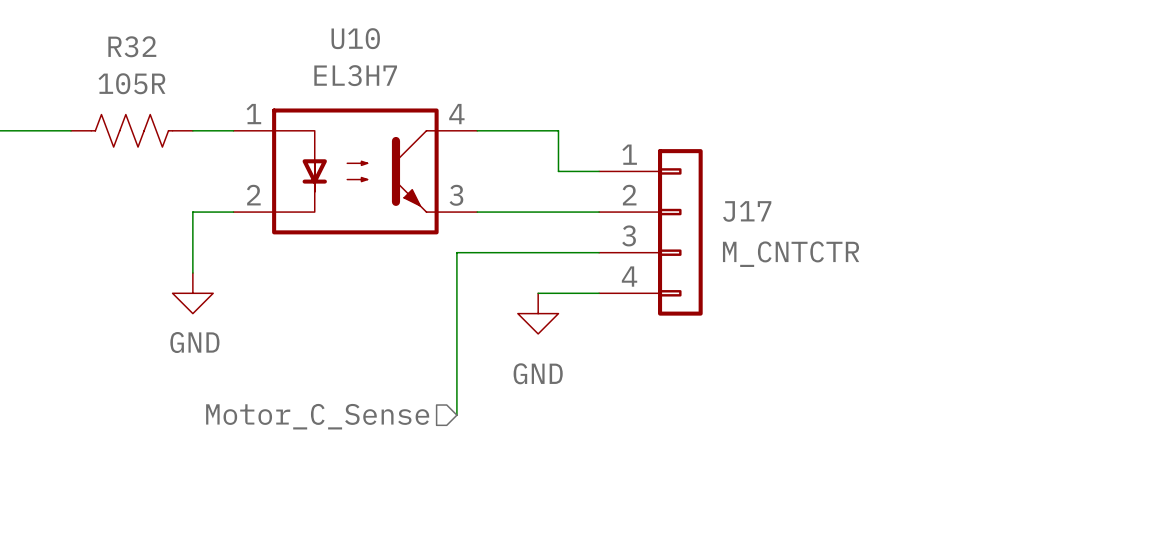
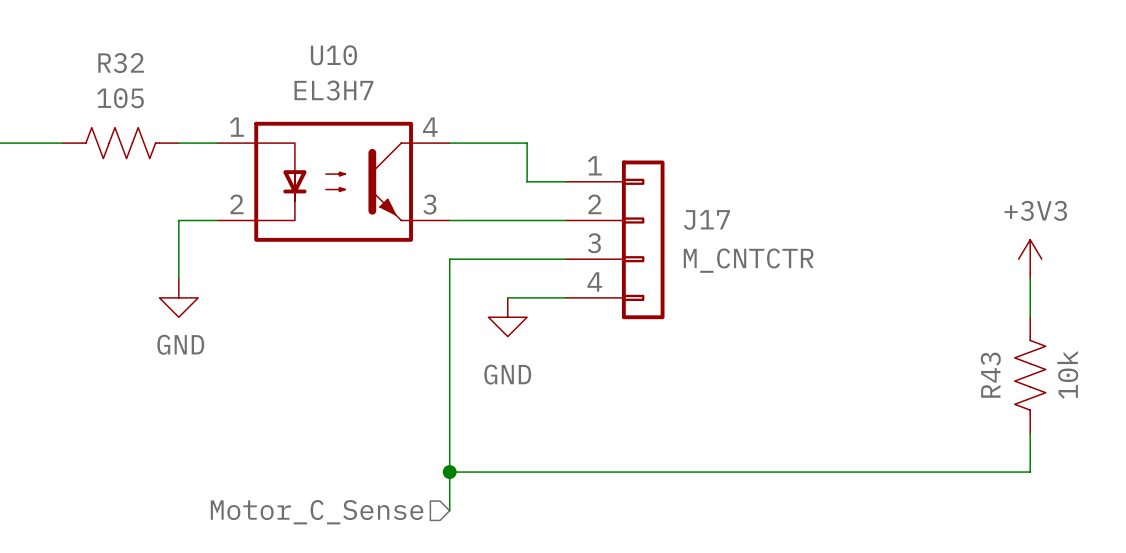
R32 value: 105R (131, 83) -> 105 (120, 98)
wire: (477, 252) (456, 252) (456, 415) -> (449, 259) (449, 510)
power symbol: none -> +3V3 (1030, 259)
wire: none -> (1030, 278) (1030, 317)
R43: none -> 10k (1030, 375)
hierarchical label position: Motor_C_Sense (317, 416) -> Motor_C_Sense (317, 512)
wire: none -> (1030, 433) (1030, 472) (449, 472)
junction: none -> (449, 472)

